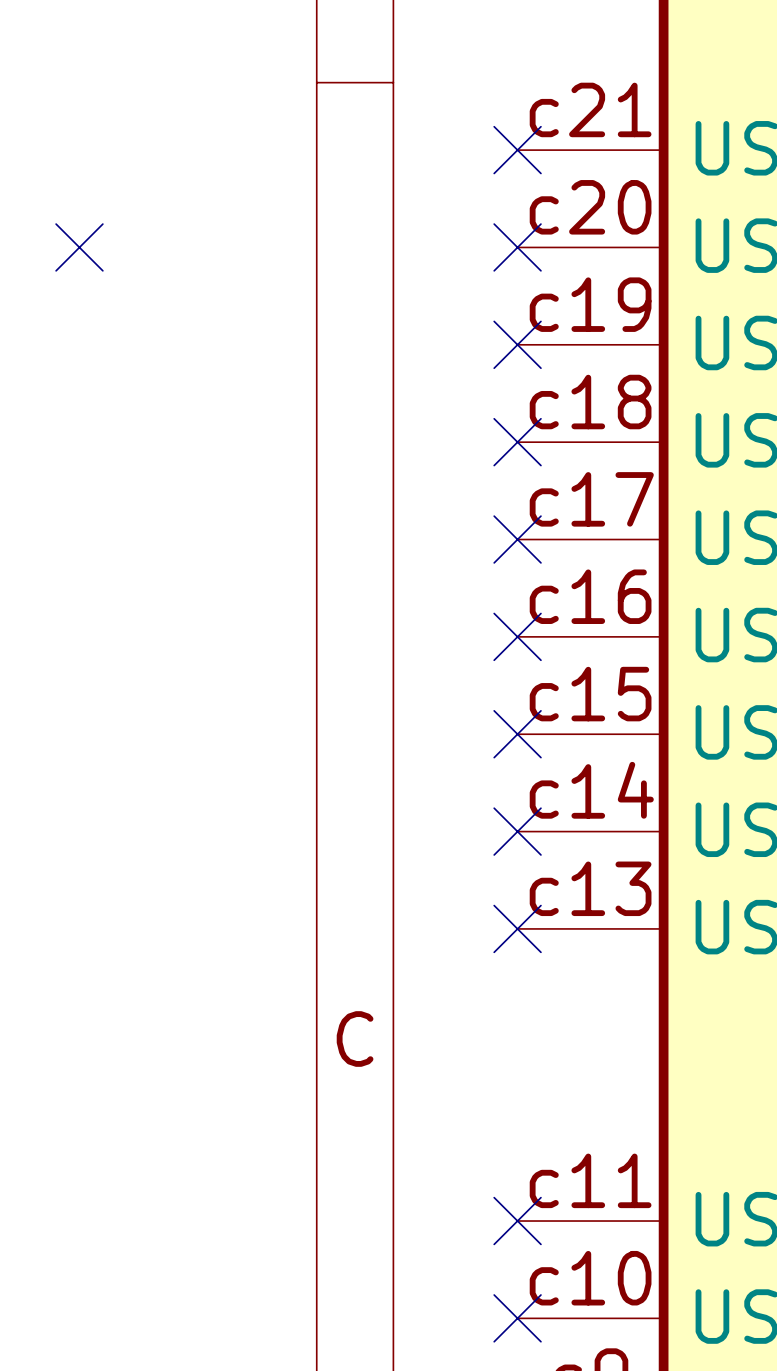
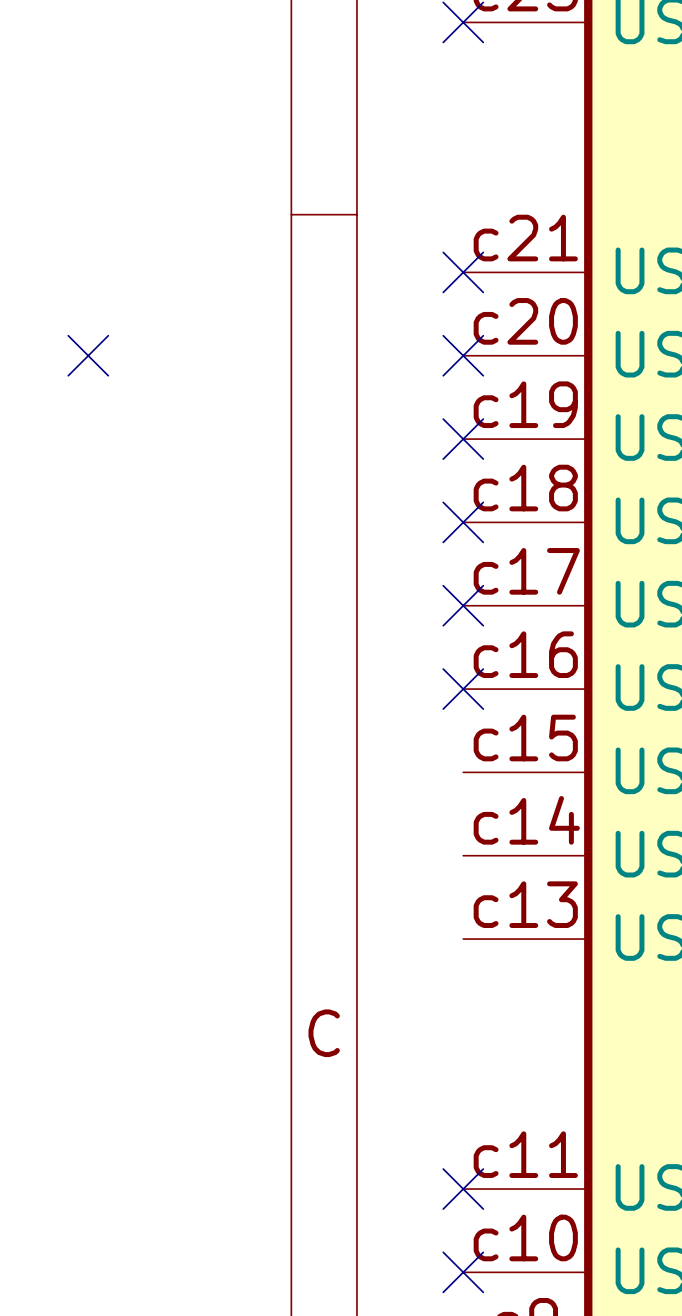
no-connect mark: (517, 734) -> none
no-connect mark: (517, 831) -> none
no-connect mark: (517, 928) -> none

